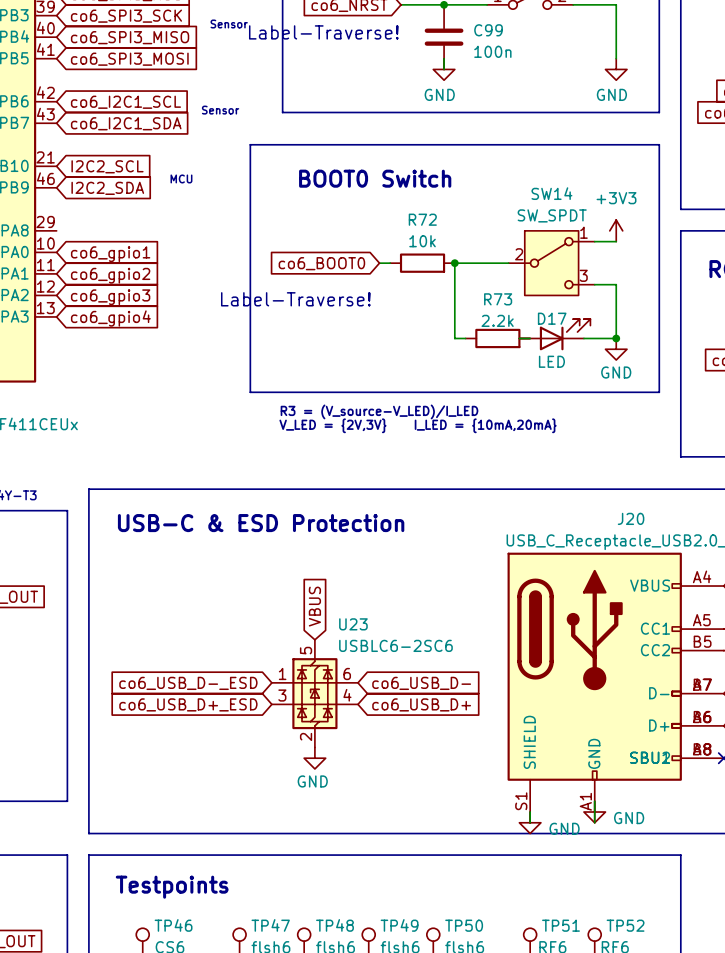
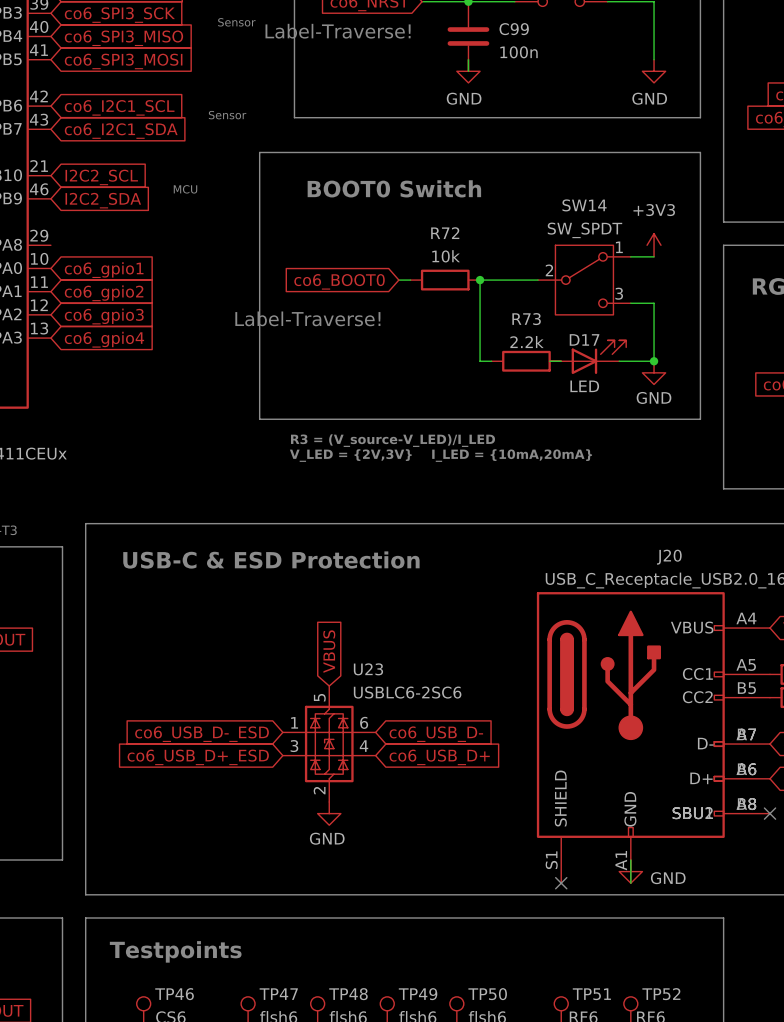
power symbol: GND (530, 822) -> none
no-connect mark: none -> (561, 883)

